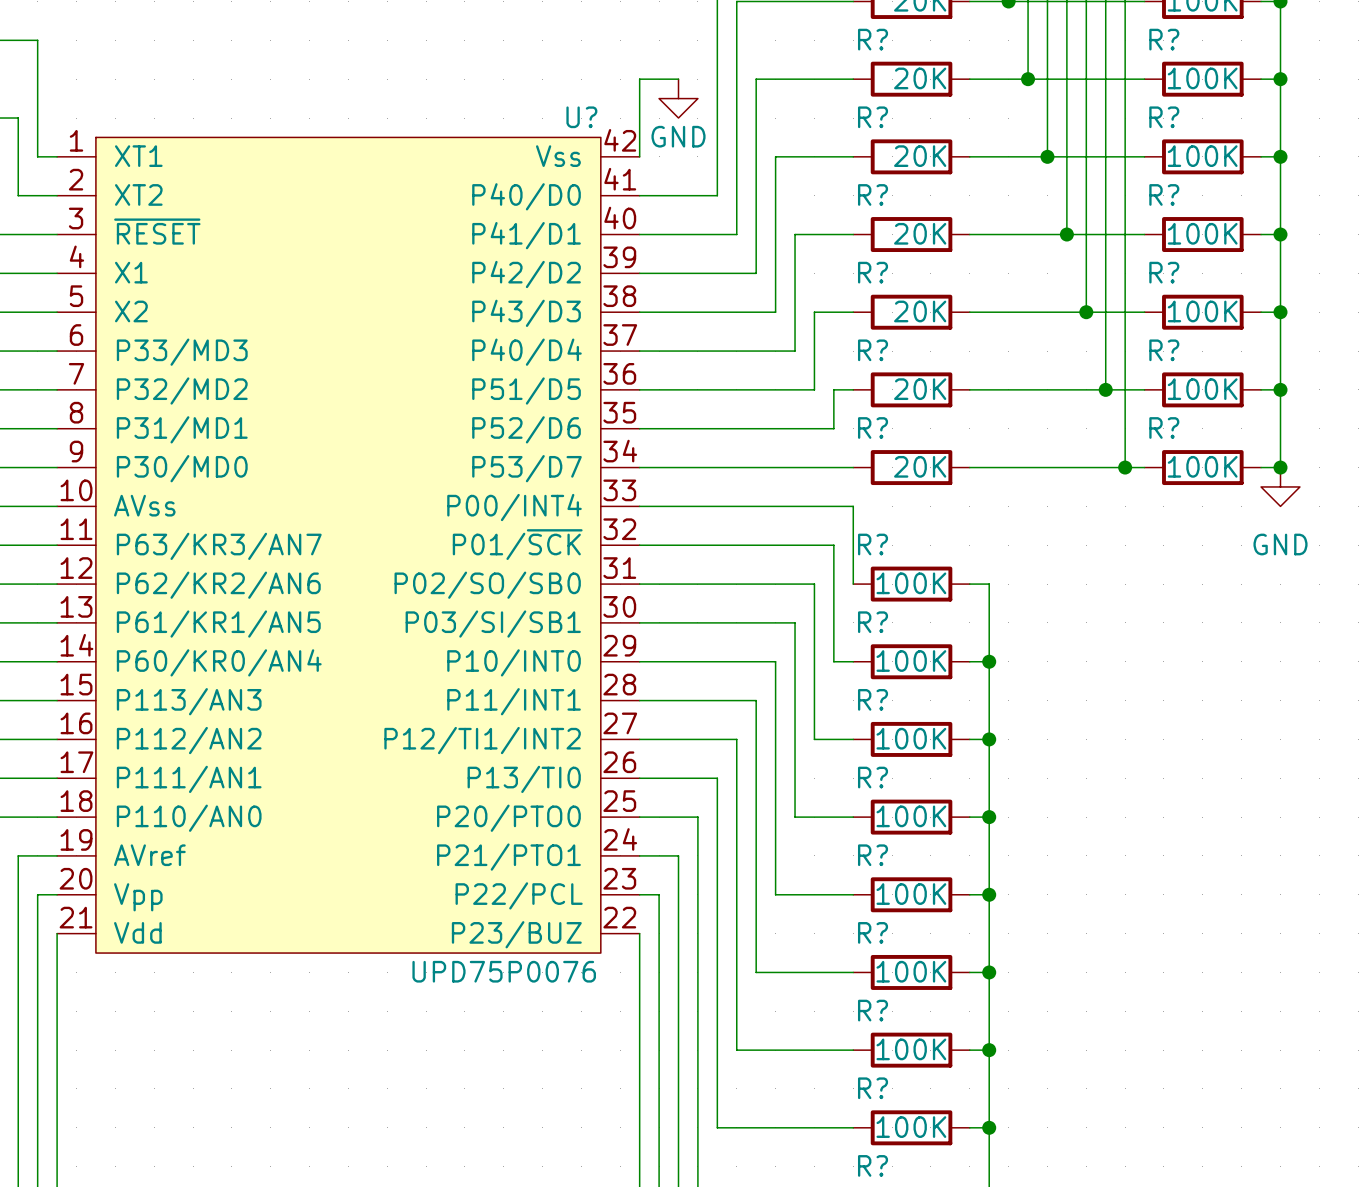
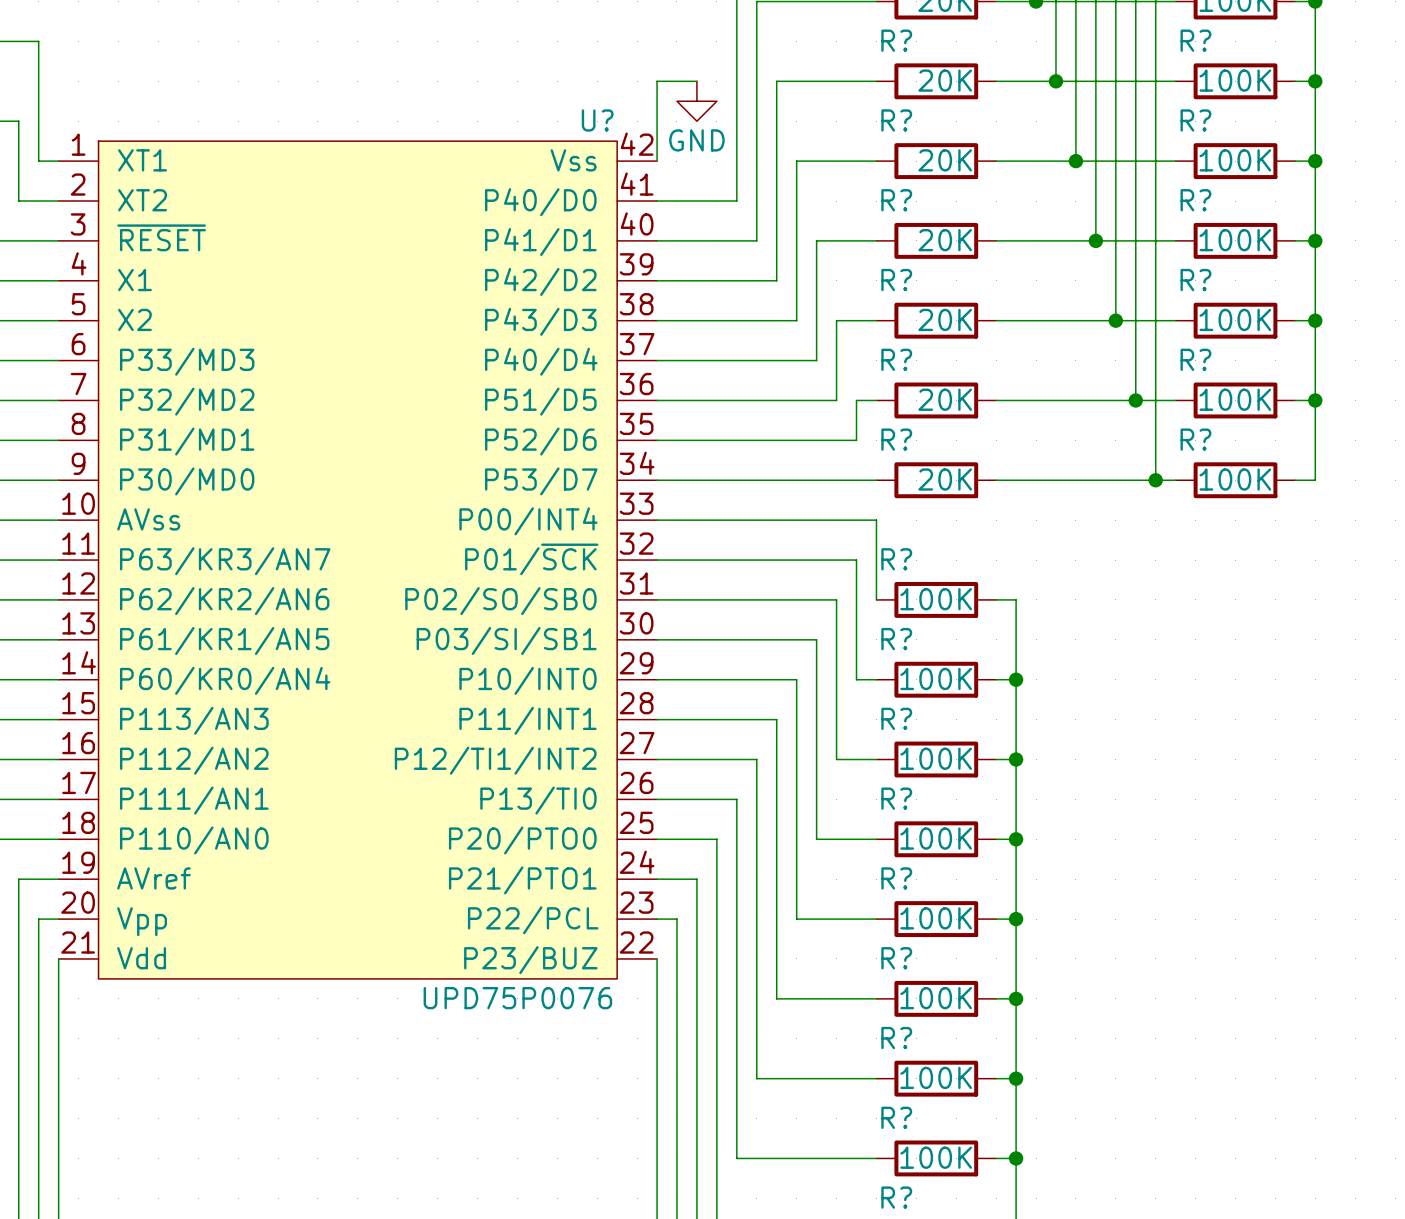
junction: (1280, 467) -> none
power symbol: GND (1280, 486) -> none

